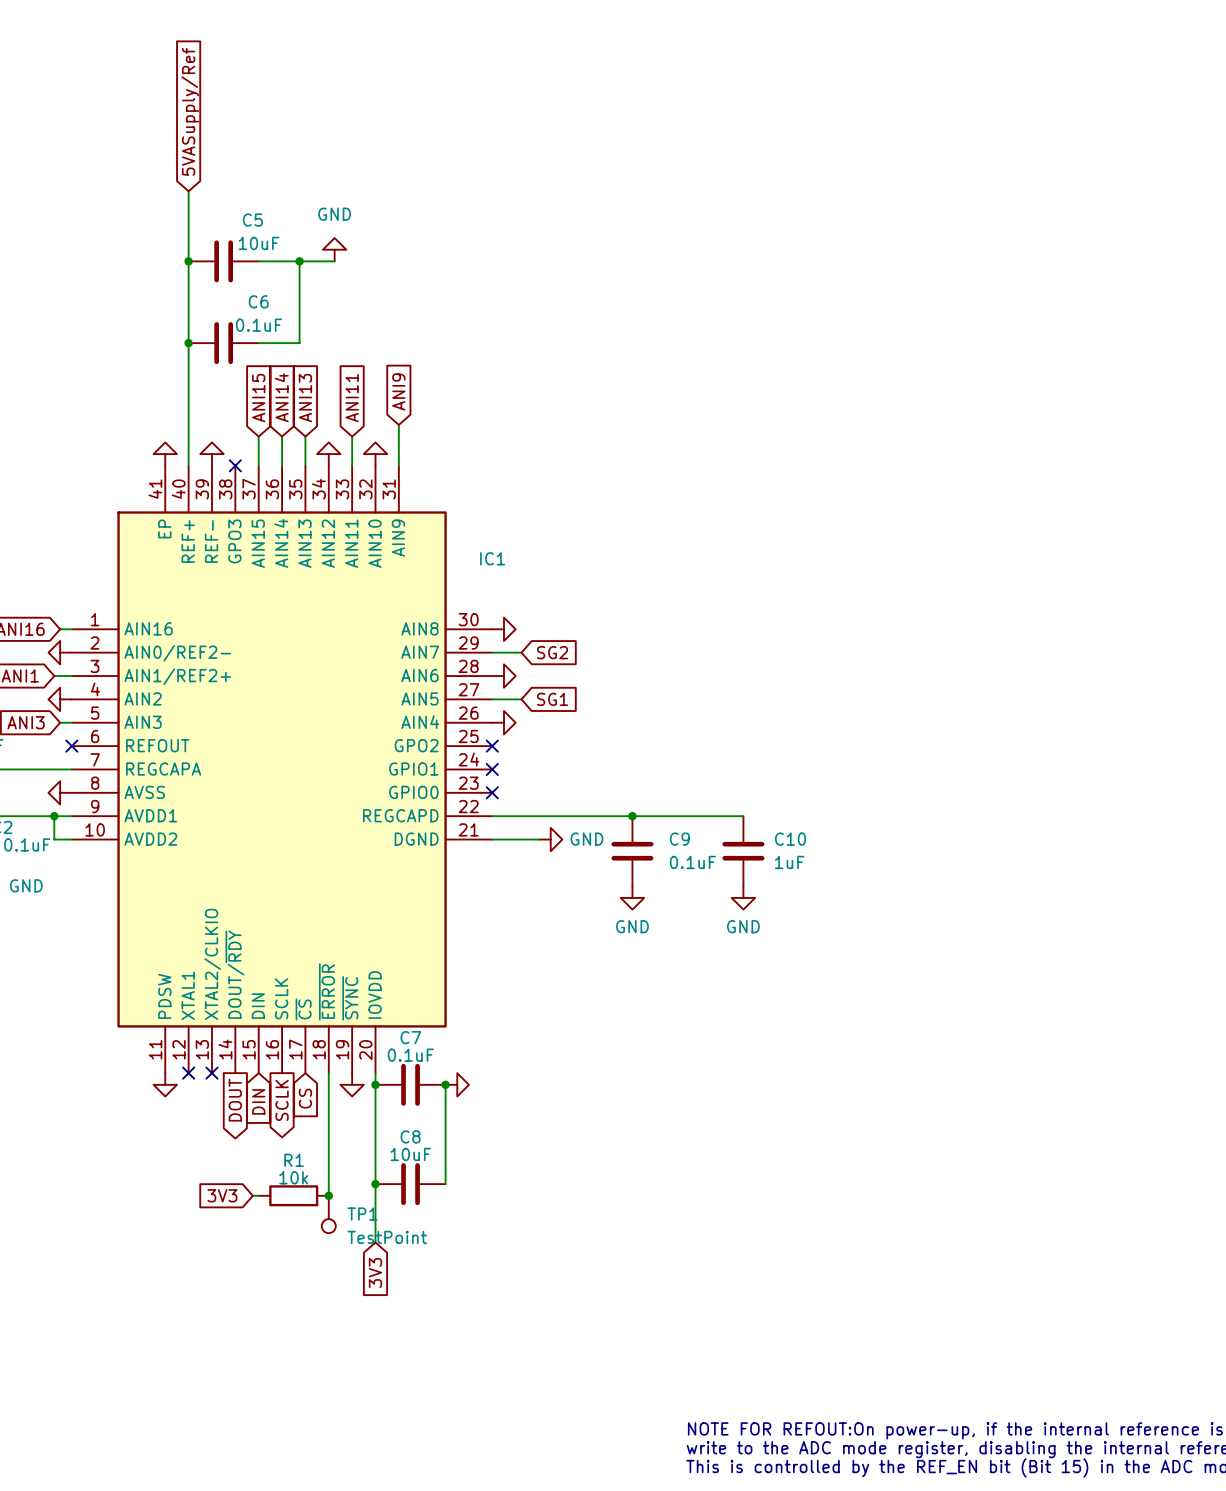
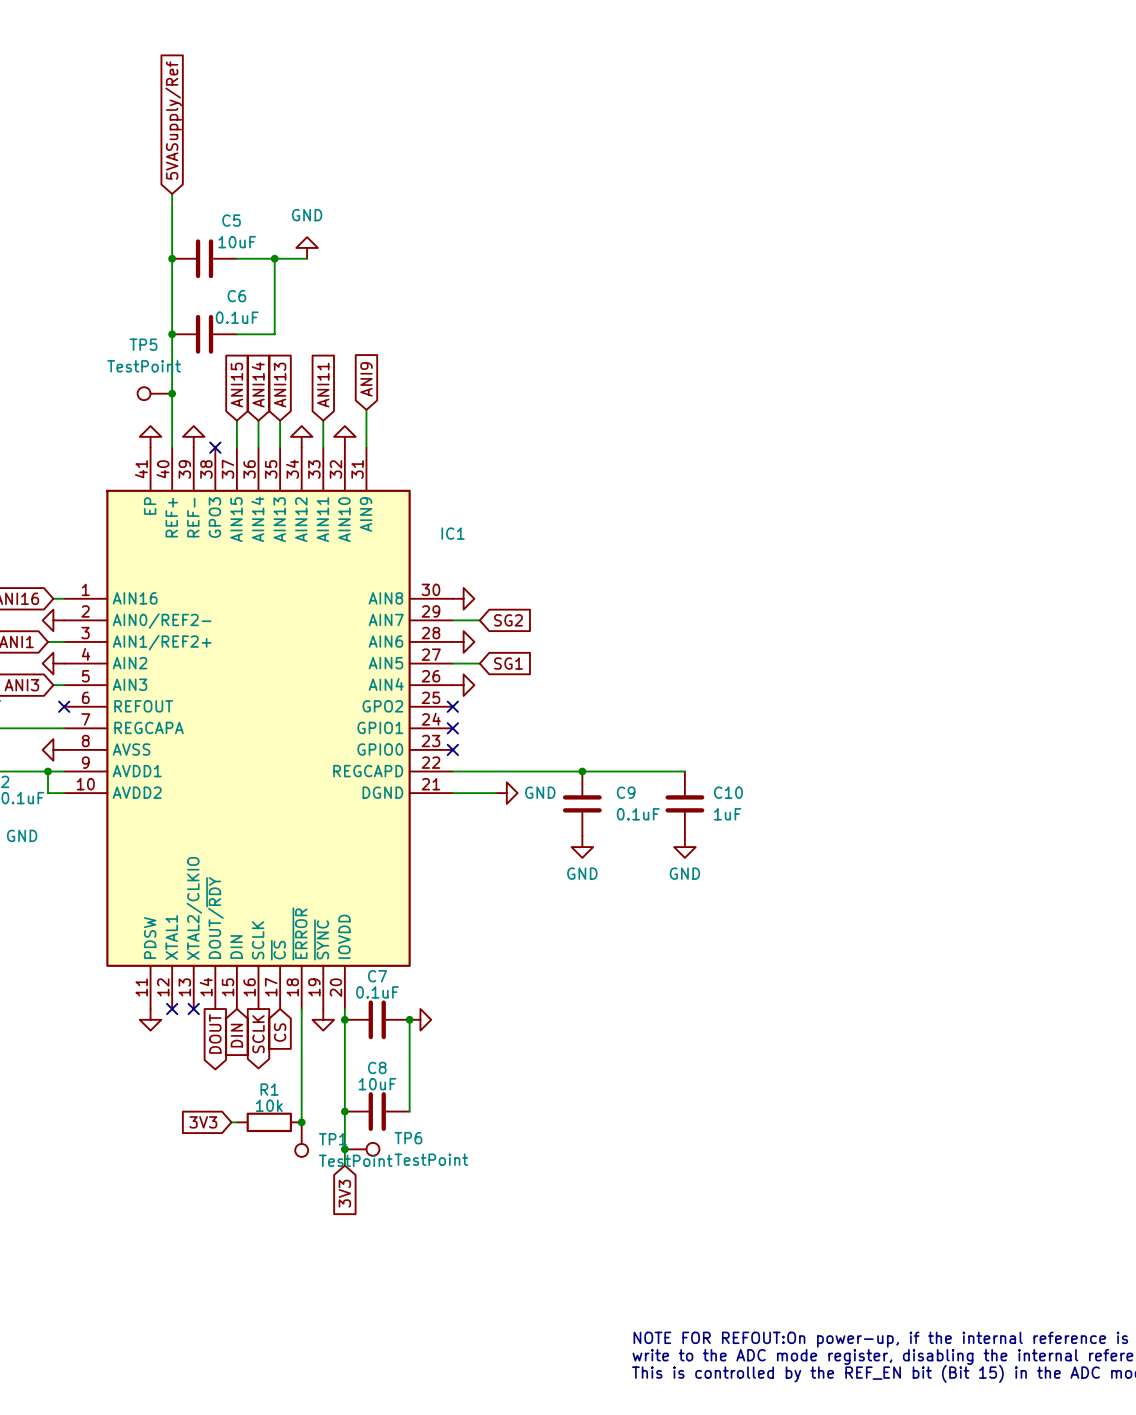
TP5: none -> TestPoint (154, 393)
junction: none -> (172, 393)
junction: none -> (344, 1149)
TP6: none -> TestPoint (362, 1149)

